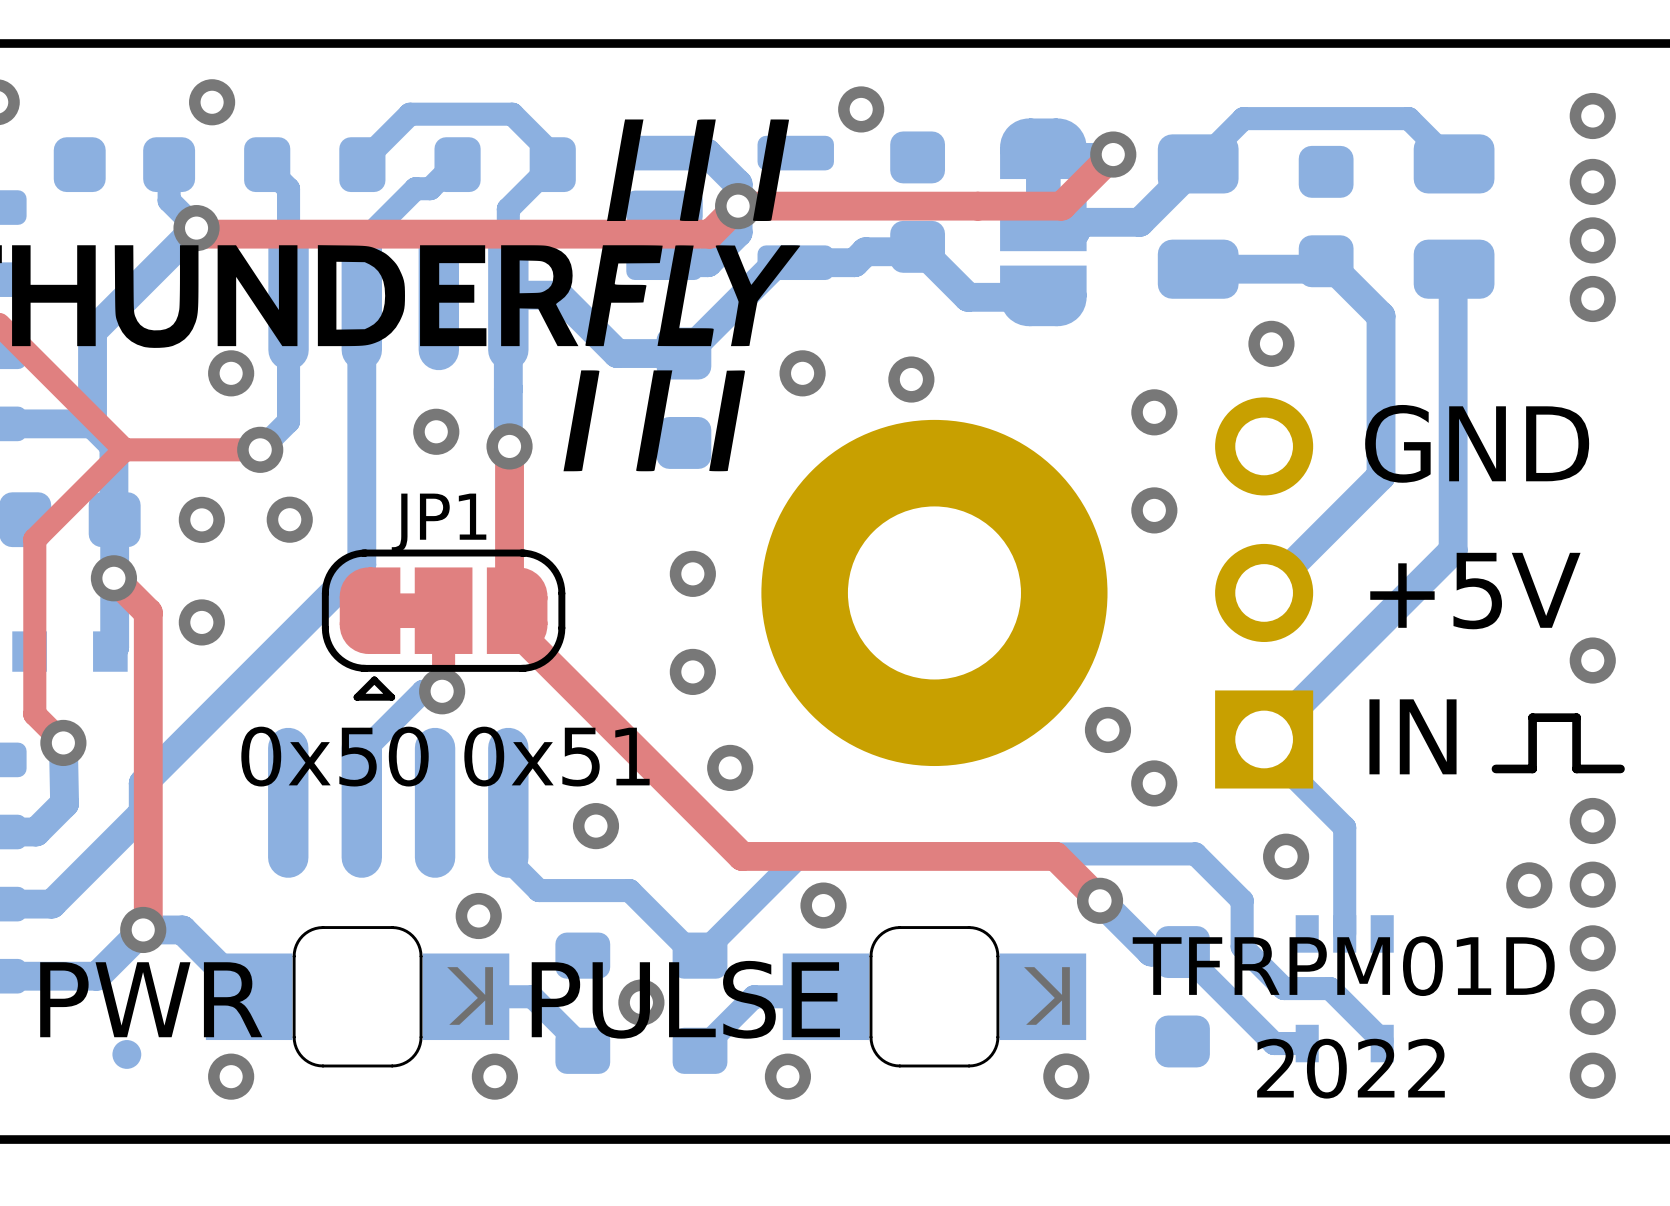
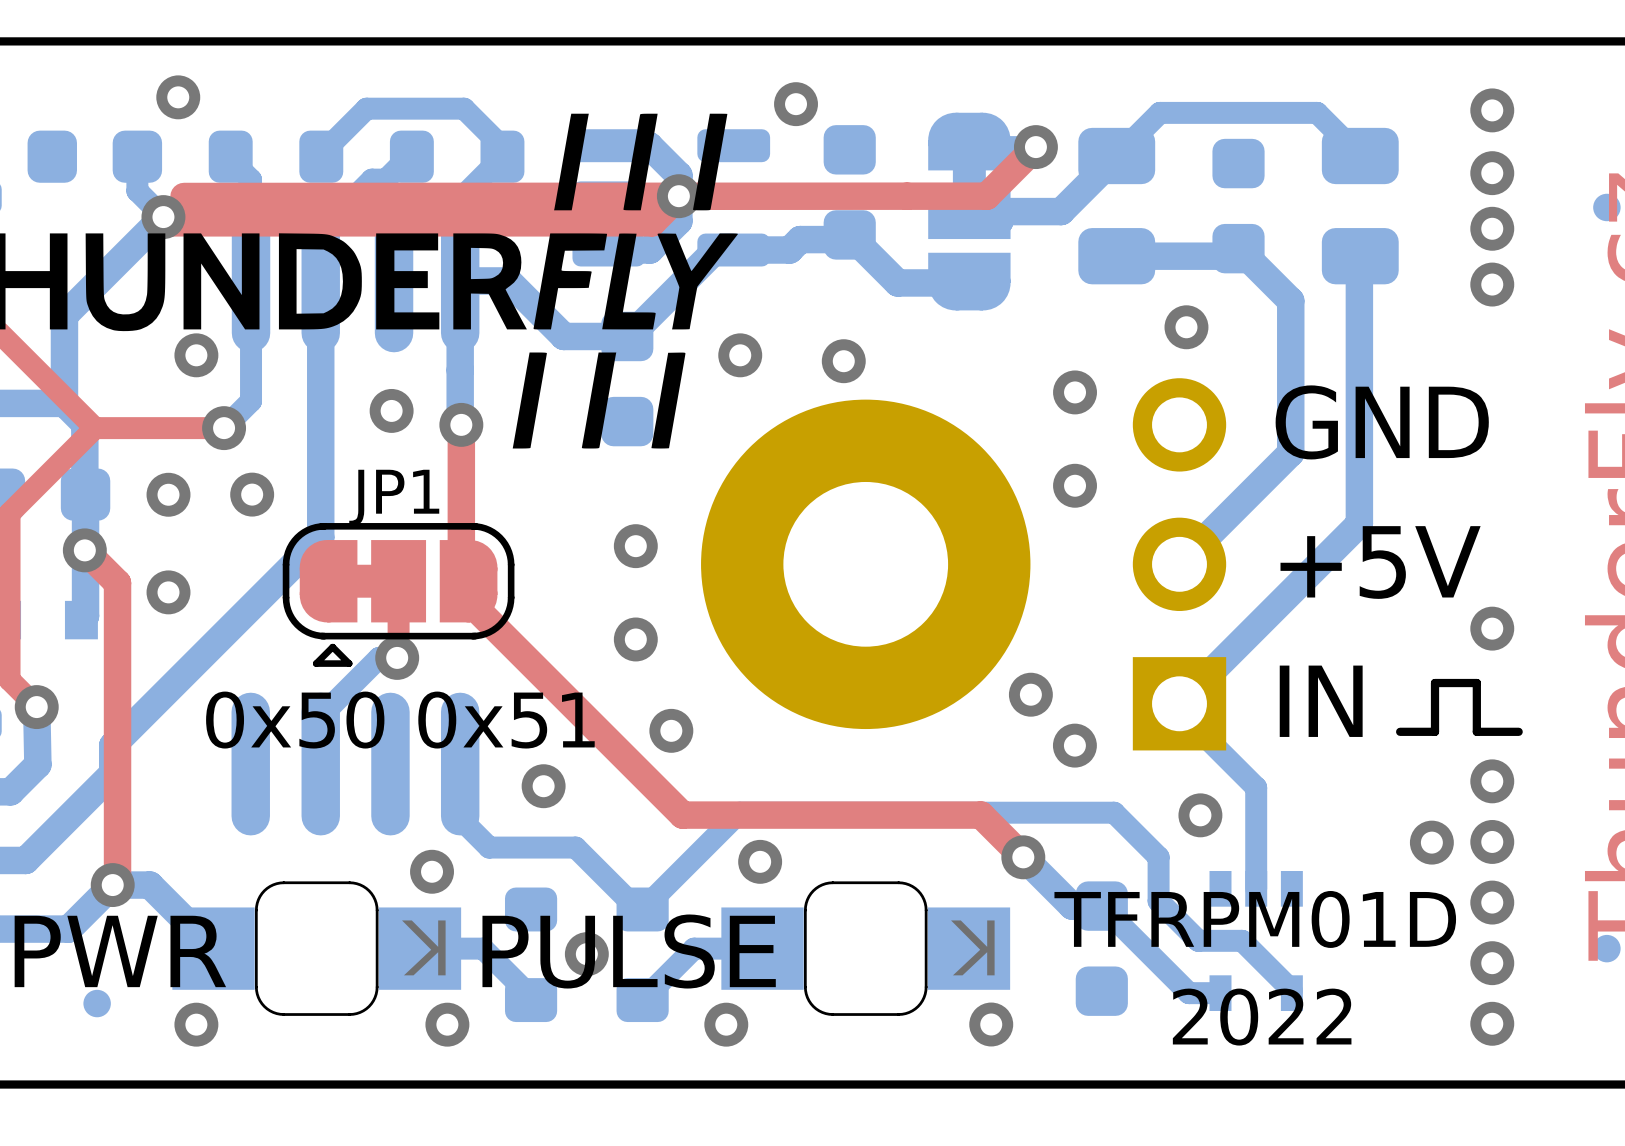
top track: (738, 206) (977, 206) -> (184, 196) (907, 196)

